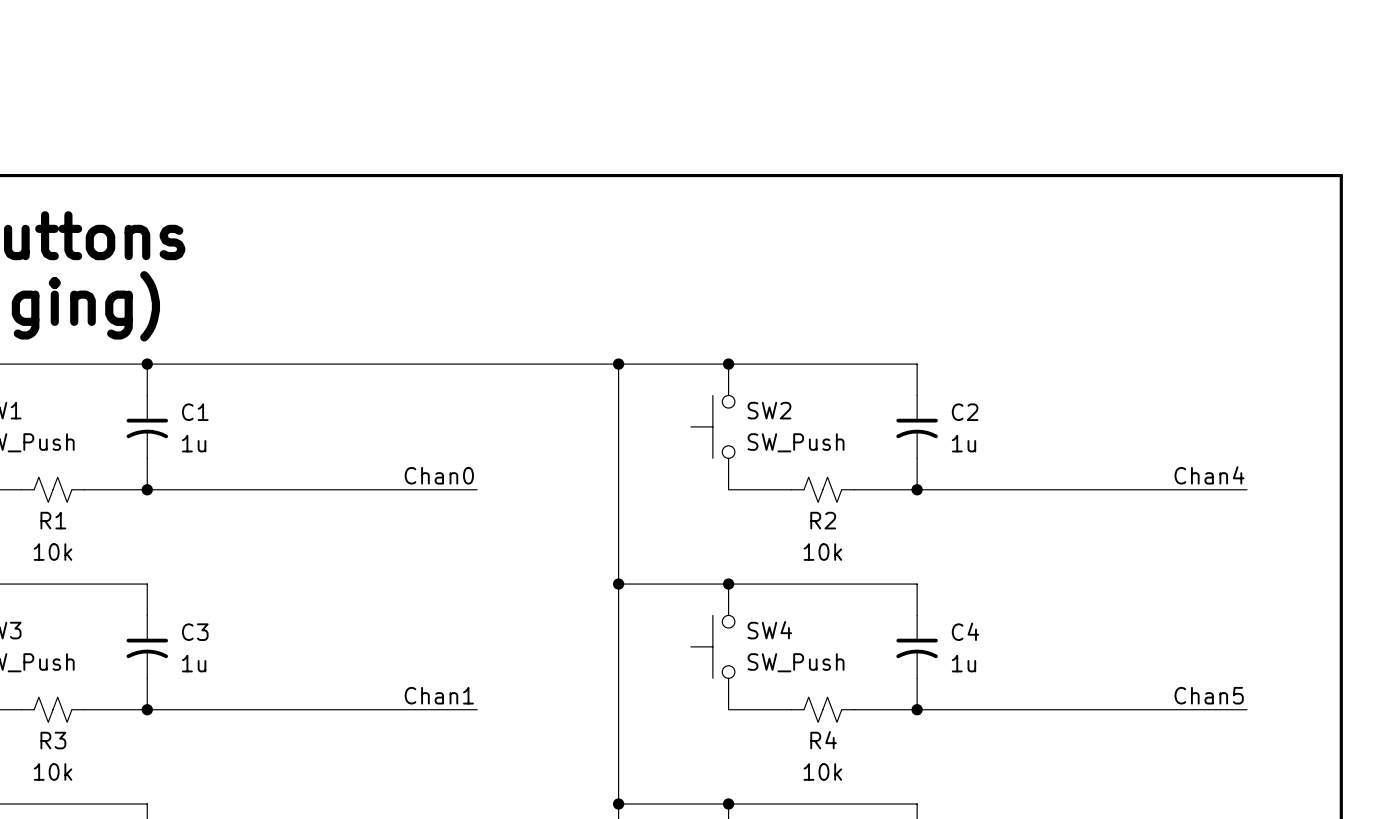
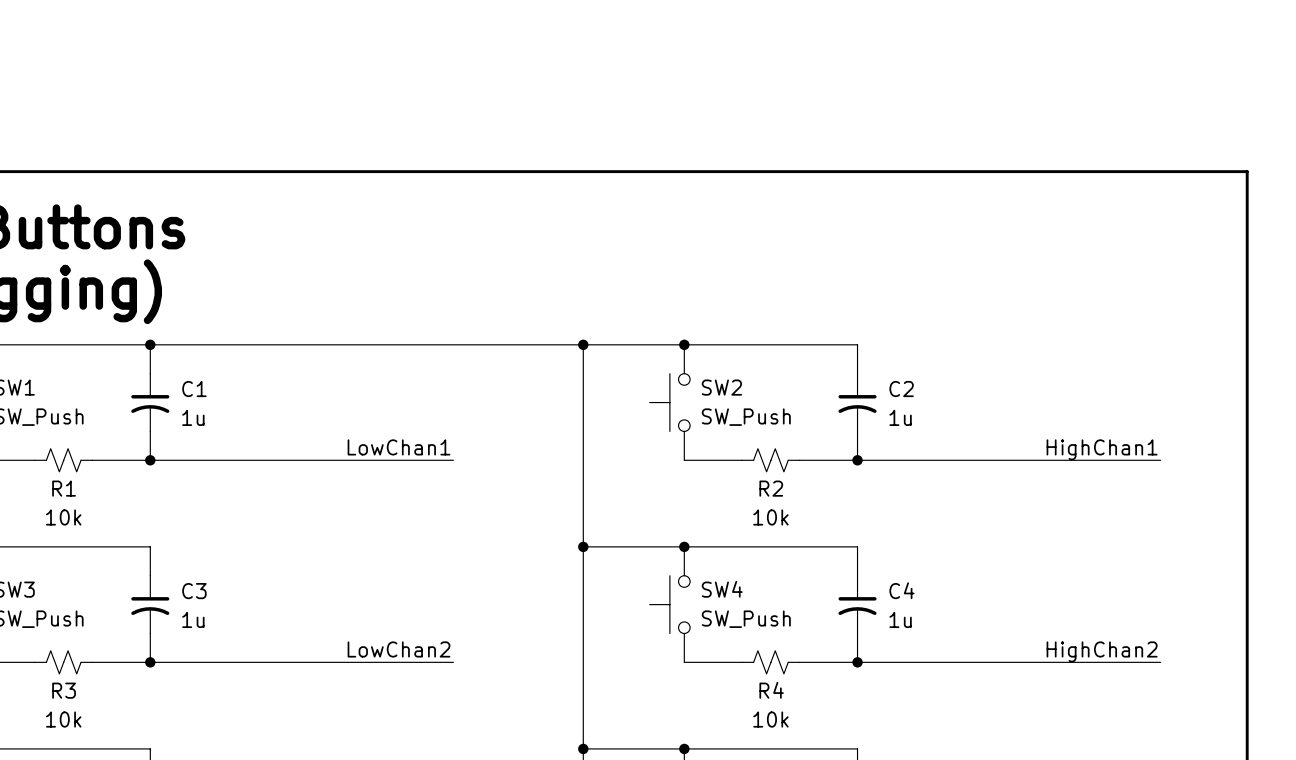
label: Chan0 (439, 475) -> LowChan1 (399, 447)
label: Chan4 (1209, 475) -> HighChan1 (1102, 449)
label: Chan1 (439, 695) -> LowChan2 (399, 649)
label: Chan5 (1209, 695) -> HighChan2 (1102, 651)

